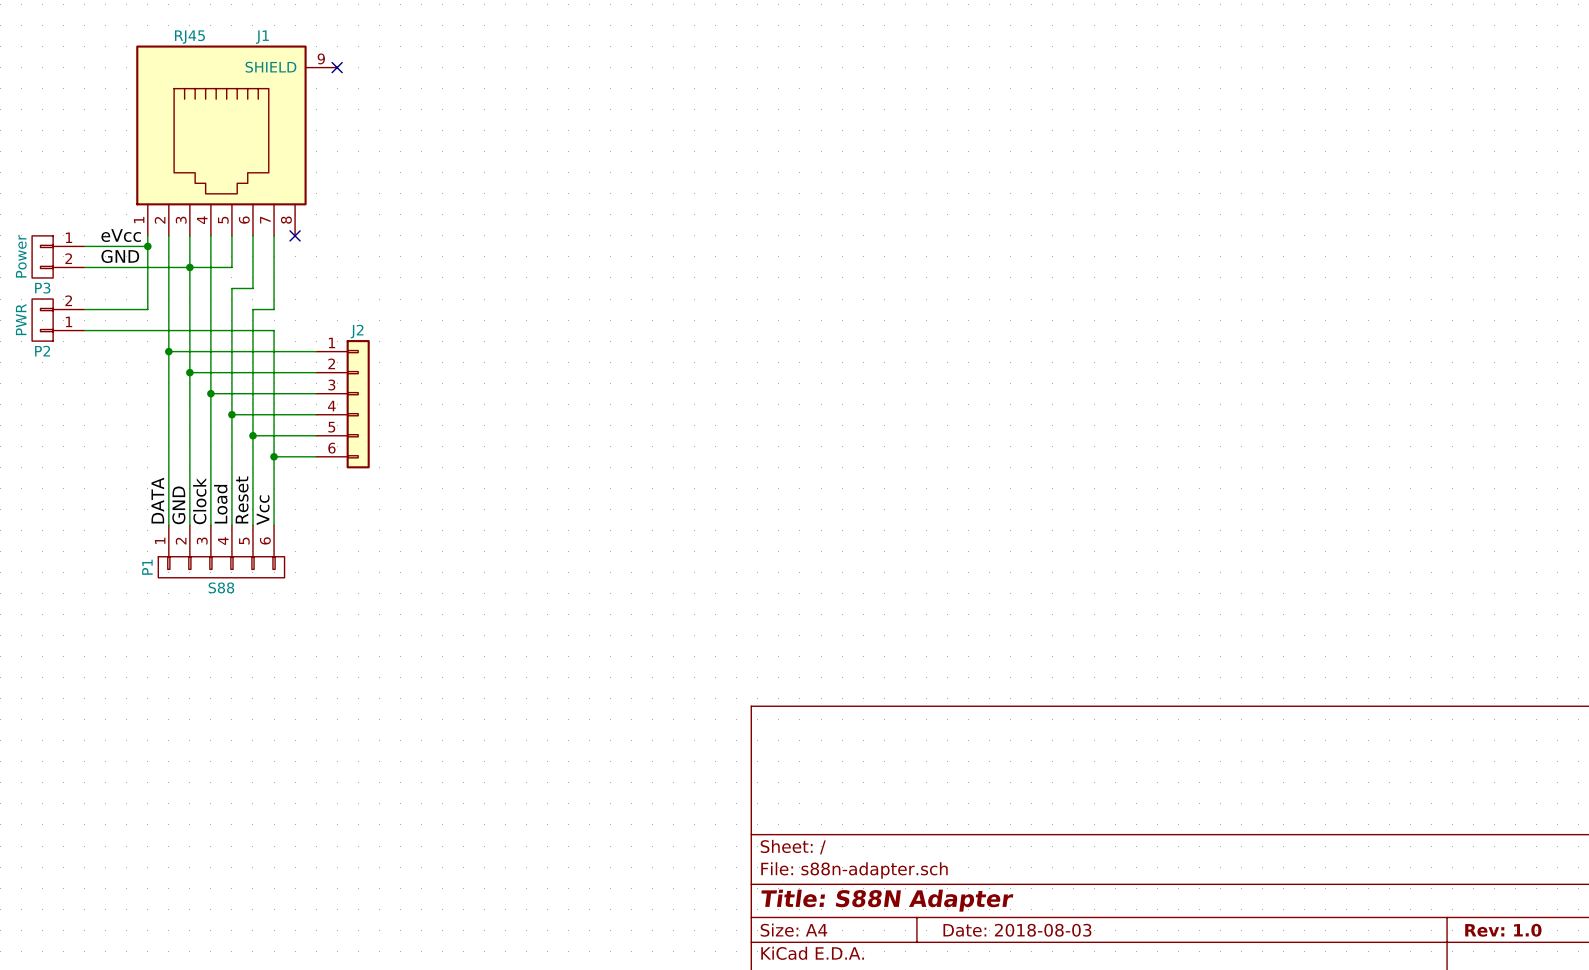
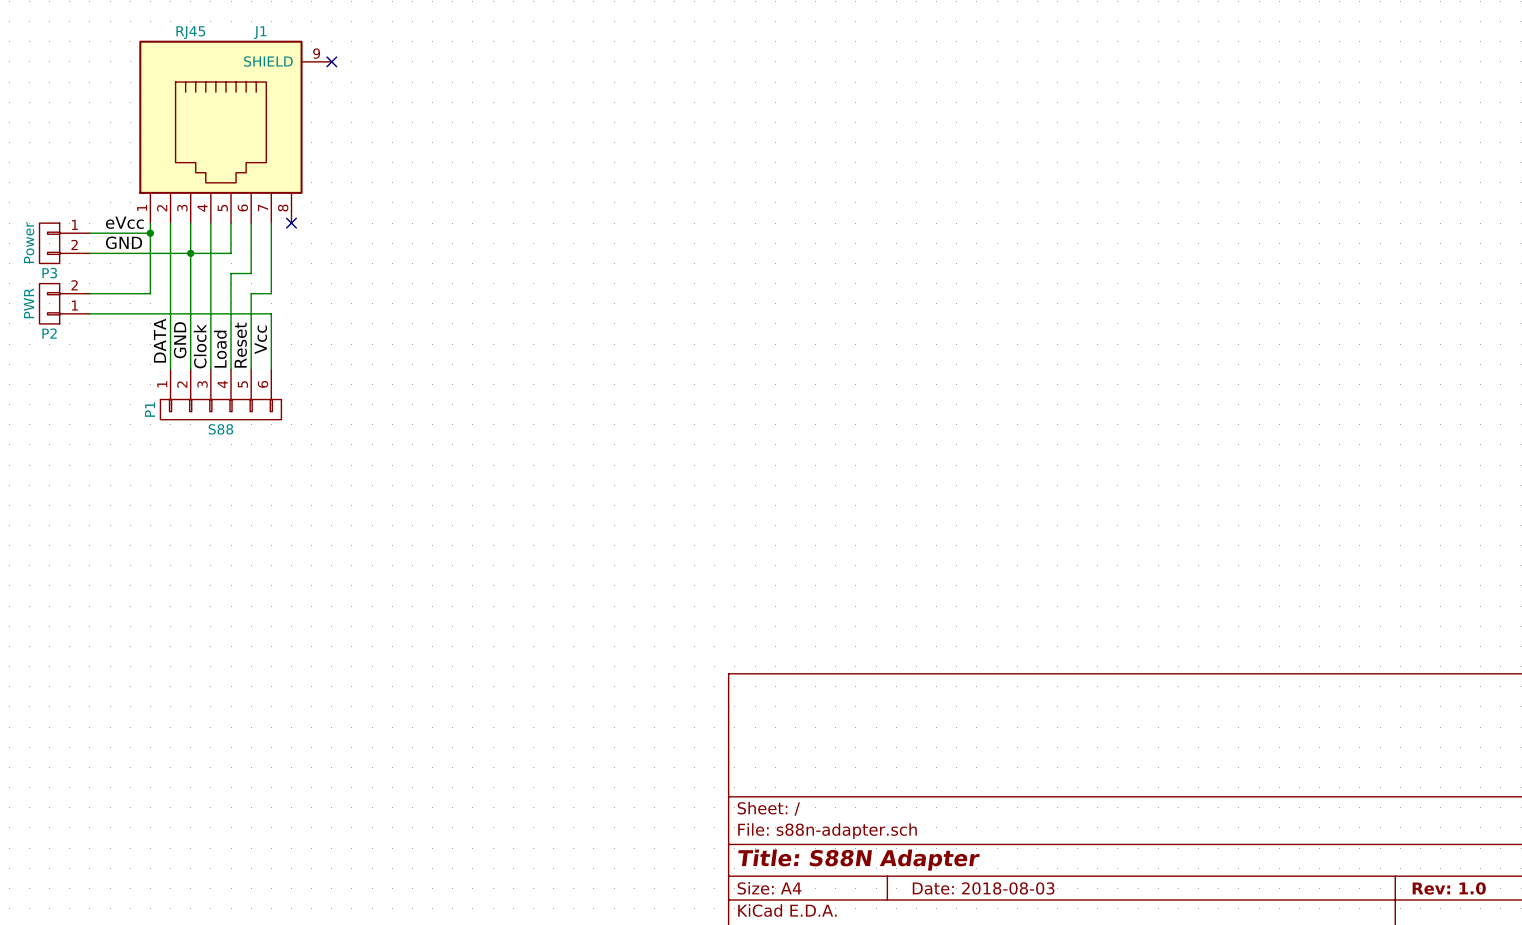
wire: (168, 351) (316, 351) -> none
junction: (168, 351) -> none
wire: (189, 372) (316, 372) -> none
junction: (189, 372) -> none
wire: (168, 388) (168, 525) -> none
wire: (189, 388) (189, 525) -> none
wire: (210, 388) (210, 525) -> none
wire: (231, 388) (231, 525) -> none
wire: (252, 388) (252, 525) -> none
wire: (274, 388) (274, 525) -> none
wire: (210, 393) (316, 393) -> none
junction: (210, 393) -> none
J2: (342, 404) -> none
wire: (231, 414) (316, 414) -> none
junction: (231, 414) -> none
wire: (252, 435) (316, 435) -> none
junction: (252, 435) -> none
wire: (274, 456) (316, 456) -> none
junction: (274, 456) -> none
label position: Reset (242, 499) -> Reset (240, 345)
label position: DATA (157, 500) -> DATA (159, 340)
label position: Clock (199, 501) -> Clock (200, 346)
label position: Load (220, 504) -> Load (220, 349)
label position: GND (178, 505) -> GND (180, 340)
label position: Vcc (263, 510) -> Vcc (260, 339)
P1 position: (221, 551) -> (220, 394)

